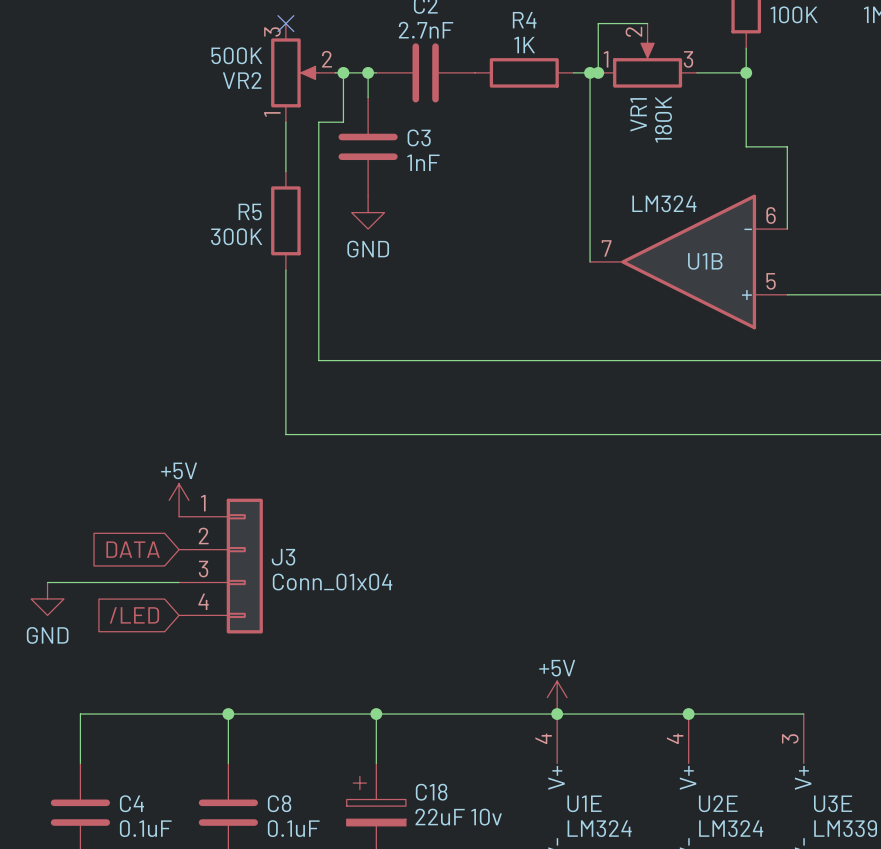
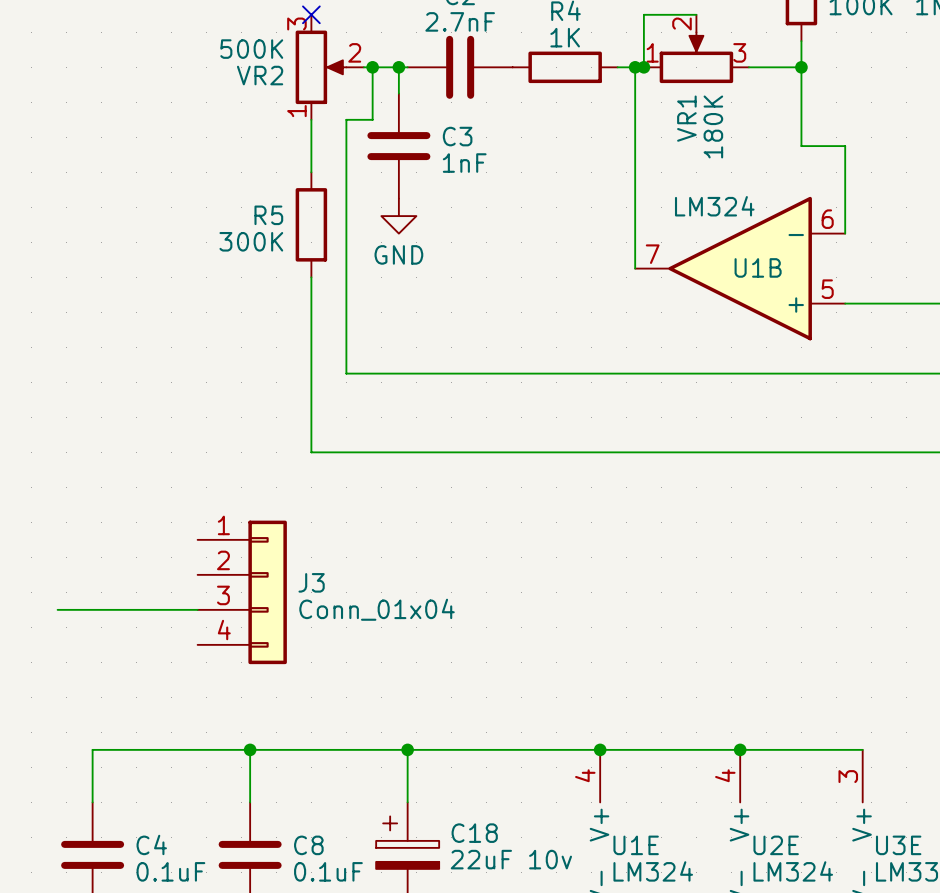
power symbol: +5V (179, 500) -> none
global label: DATA (133, 549) -> none
power symbol: GND (47, 598) -> none
global label: /LED (134, 615) -> none
power symbol: +5V (557, 697) -> none

